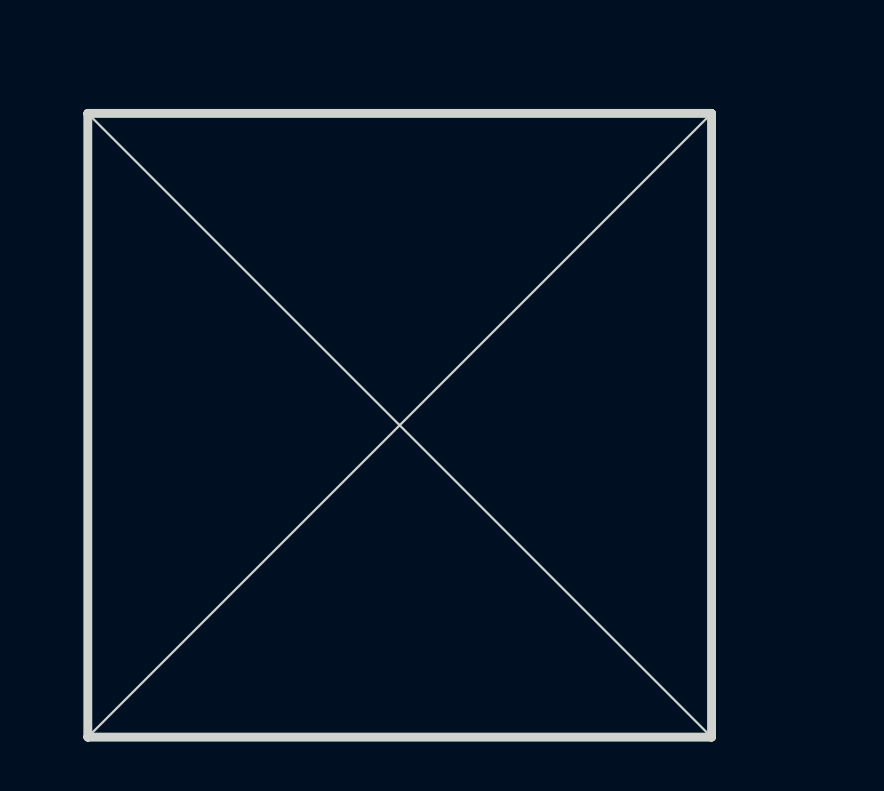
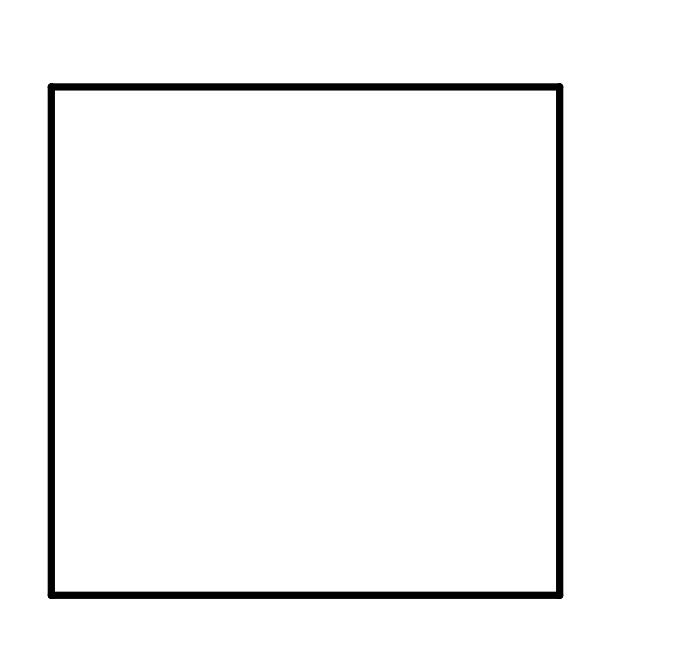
board edge: (87, 113) (711, 737) -> none
board edge: (711, 113) (87, 737) -> none

